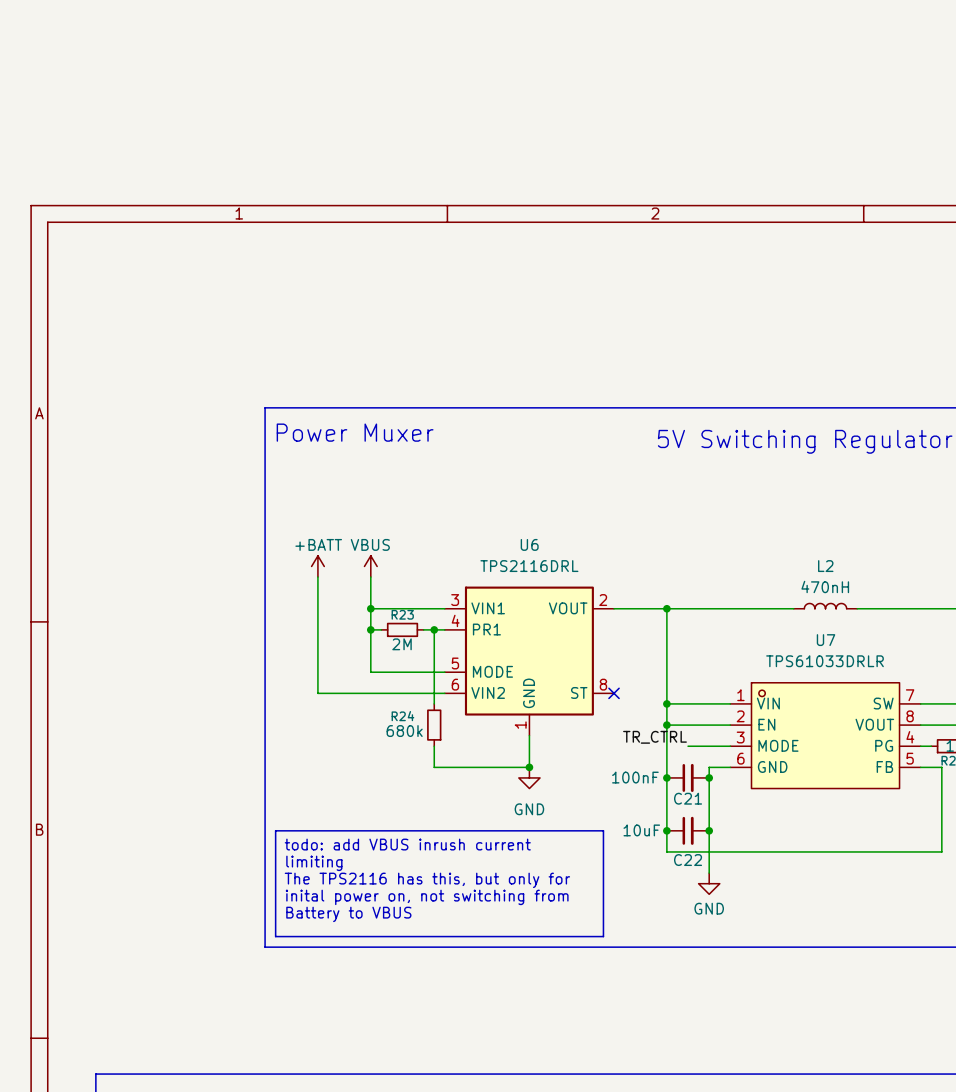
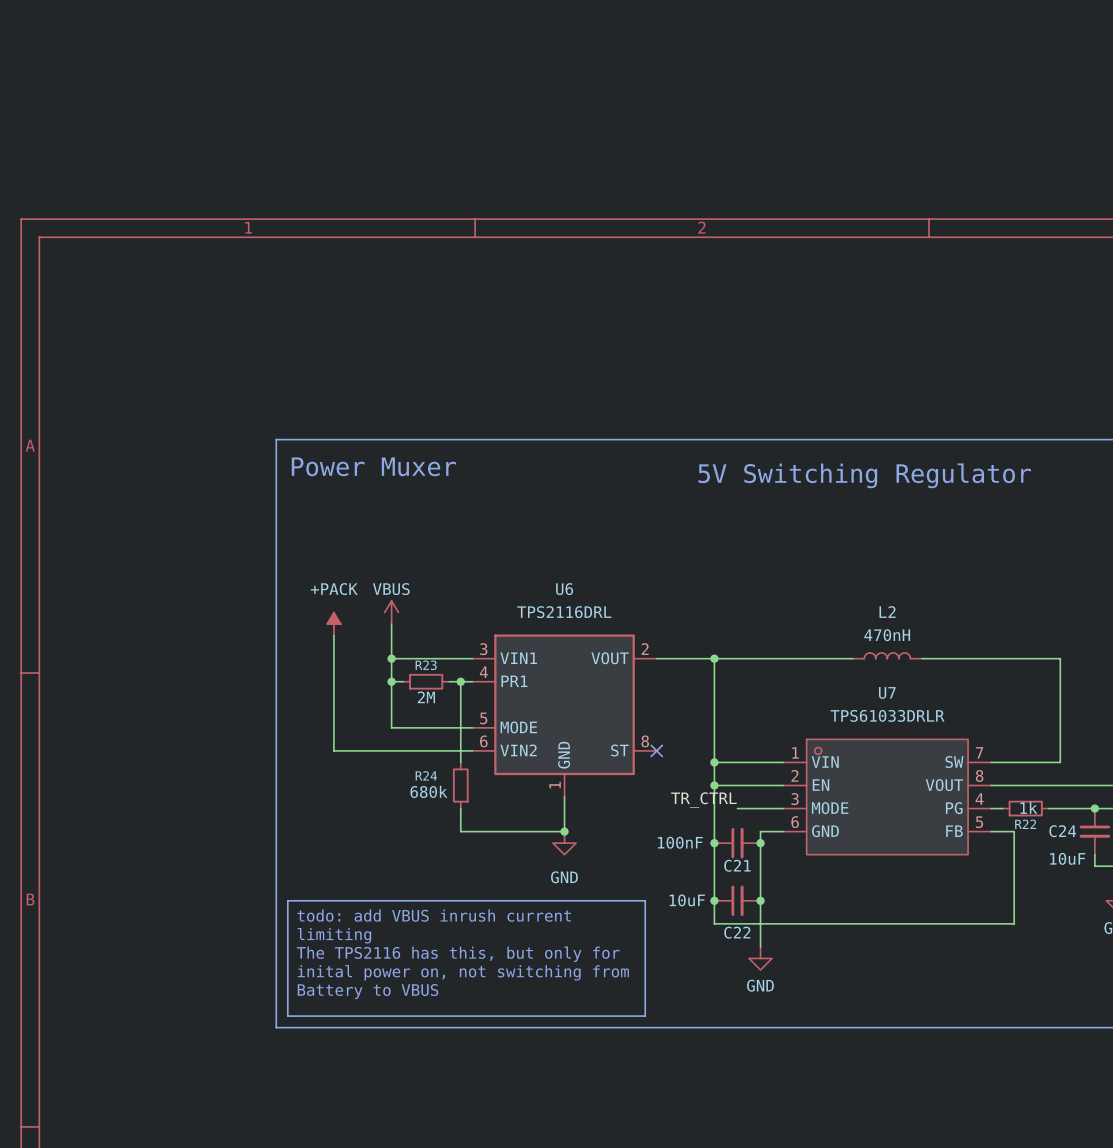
power symbol: +BATT (317, 566) -> none
power symbol: none -> +PACK (333, 624)

